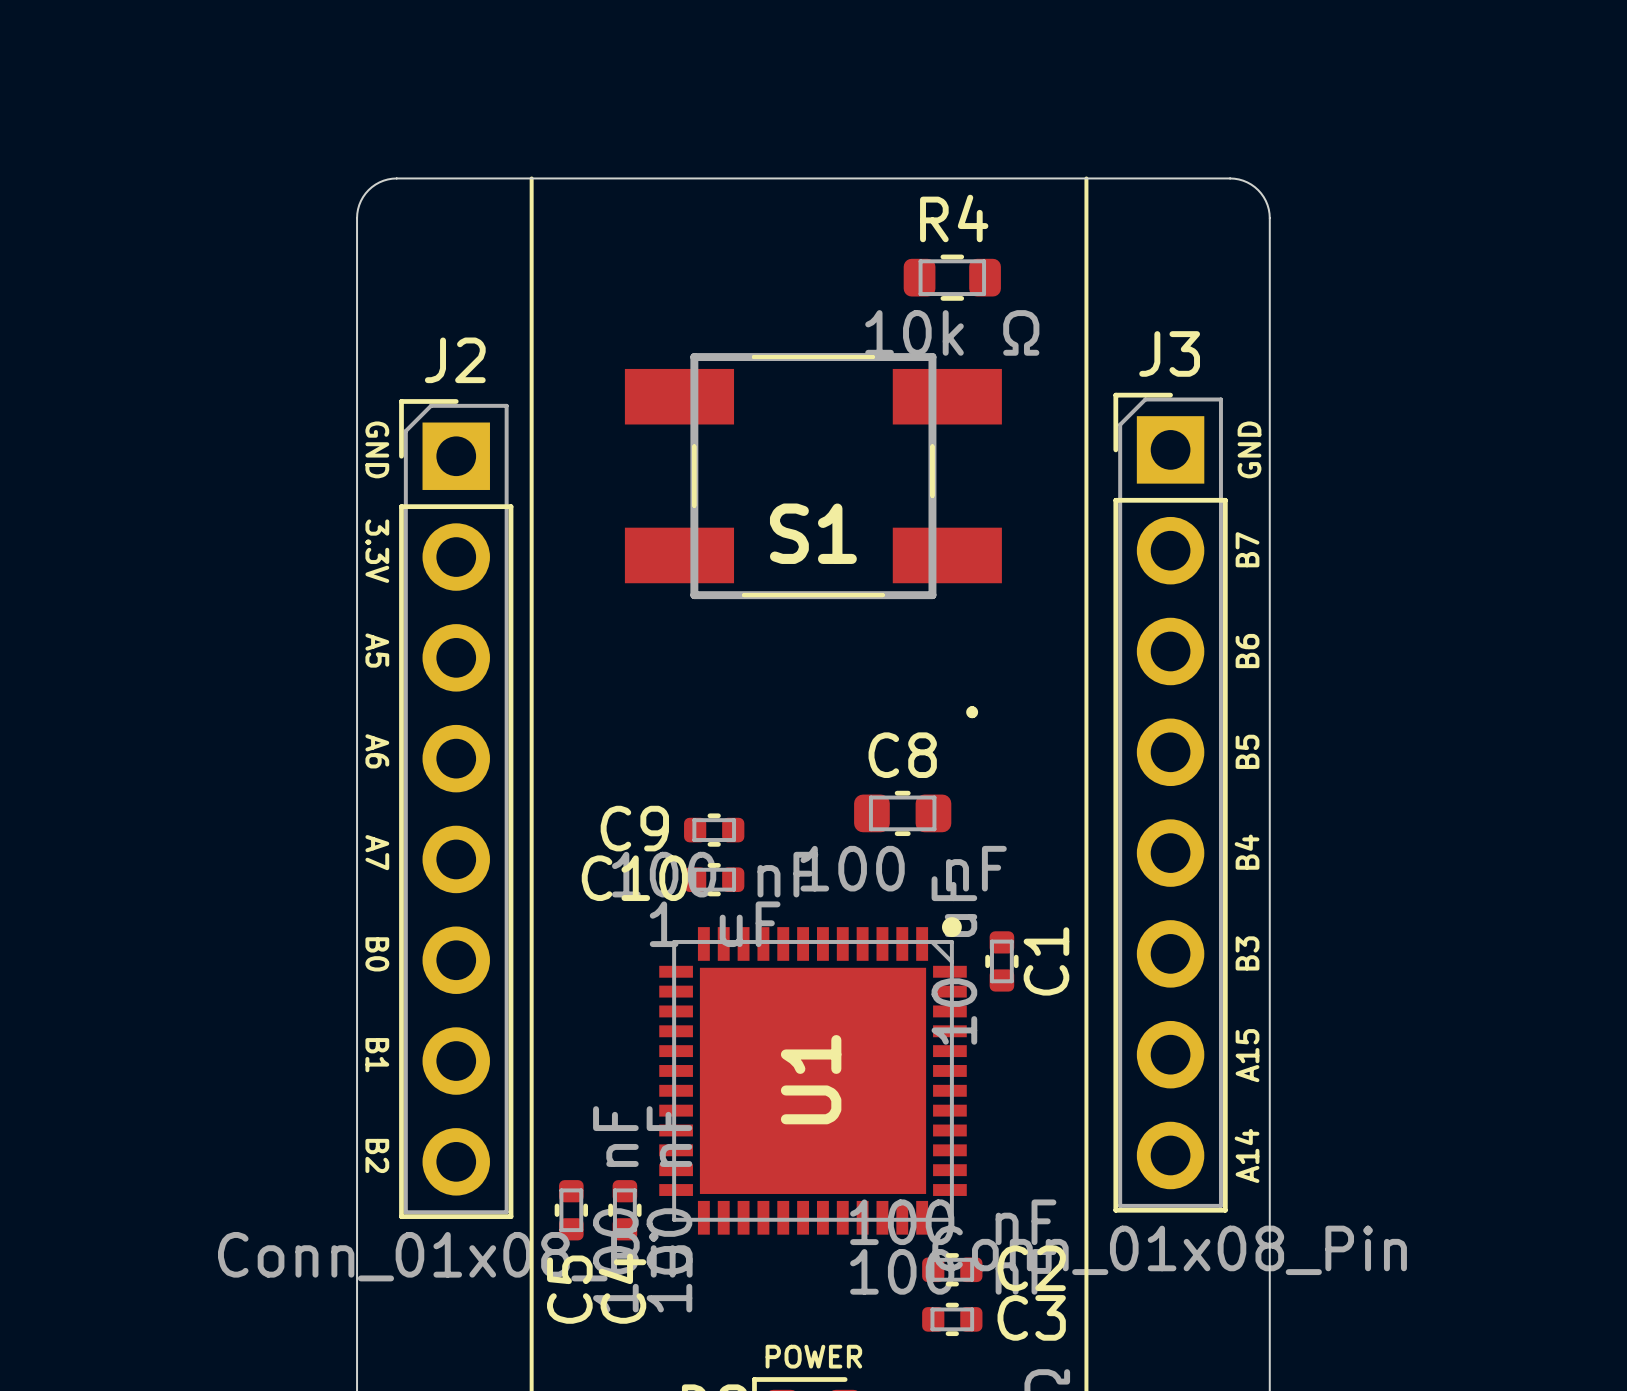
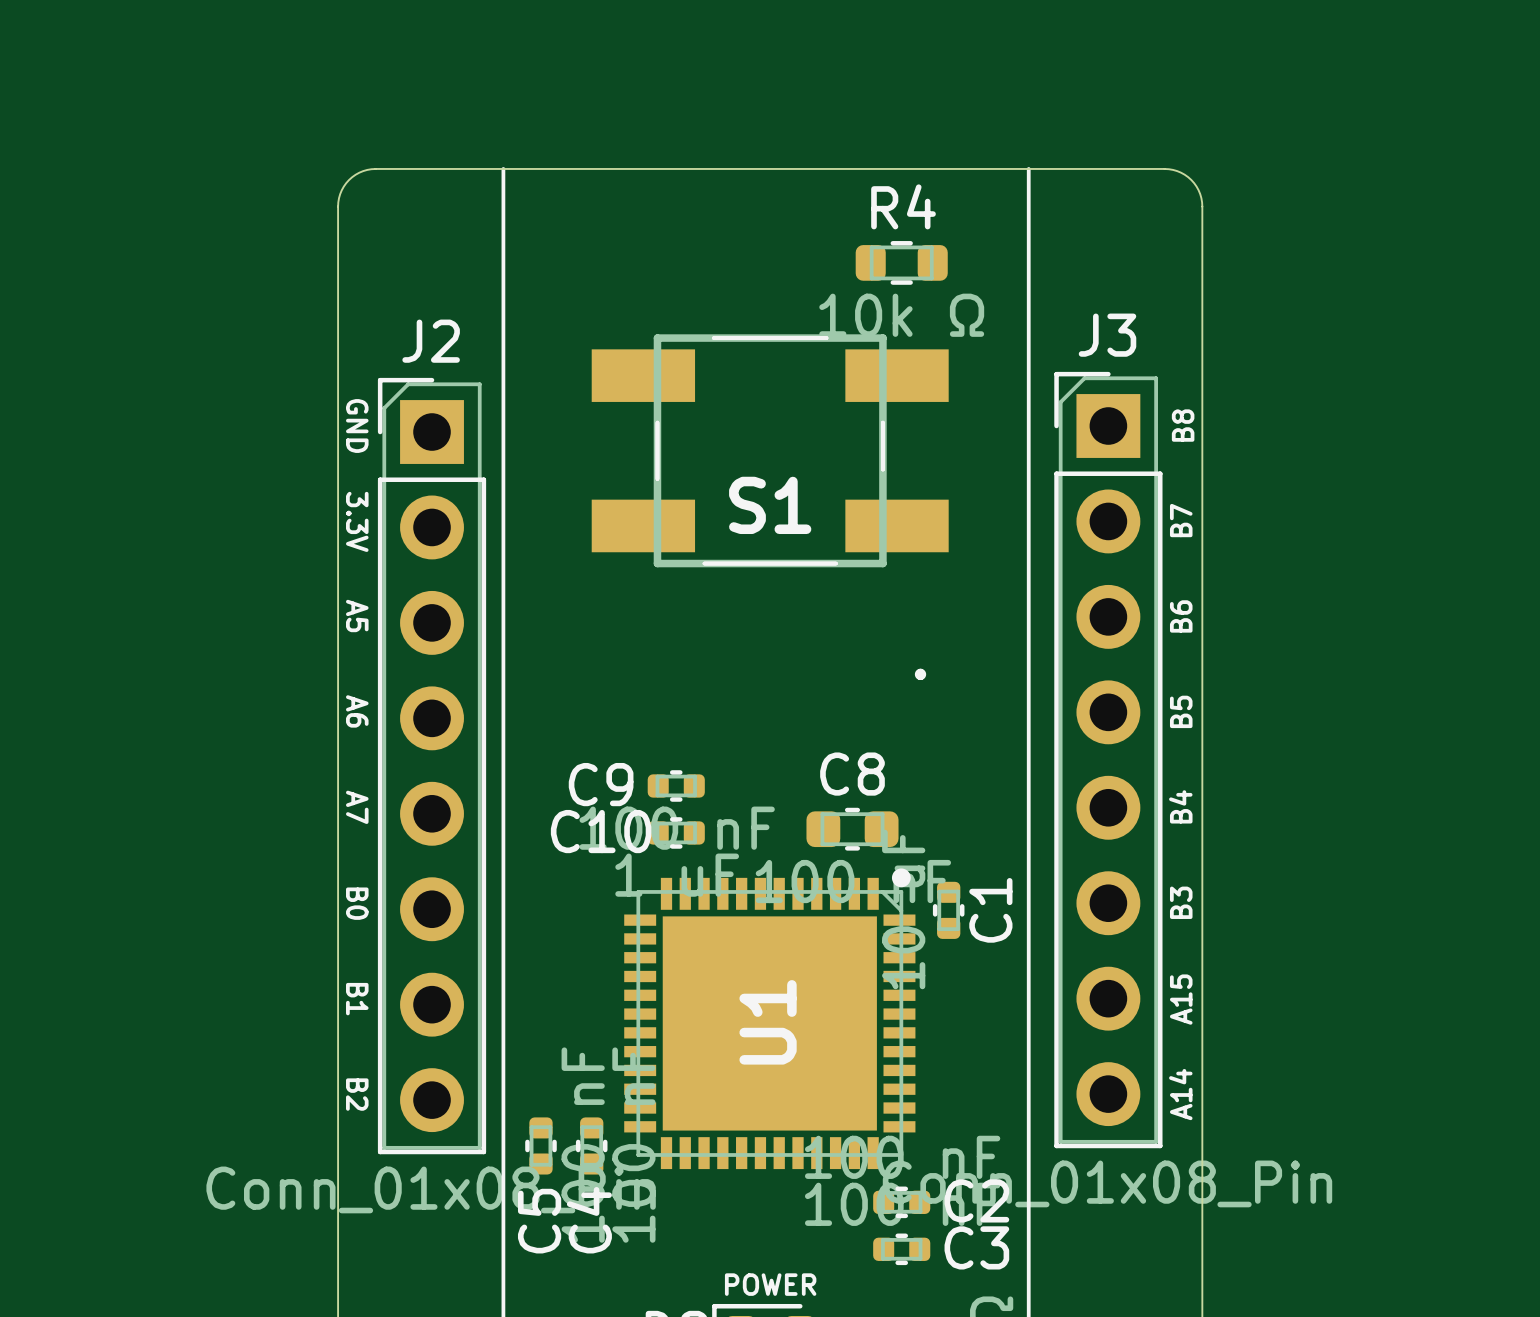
text: GND (1249, 449) -> B8 (1183, 425)
C8 position: (902, 813) -> (852, 829)

